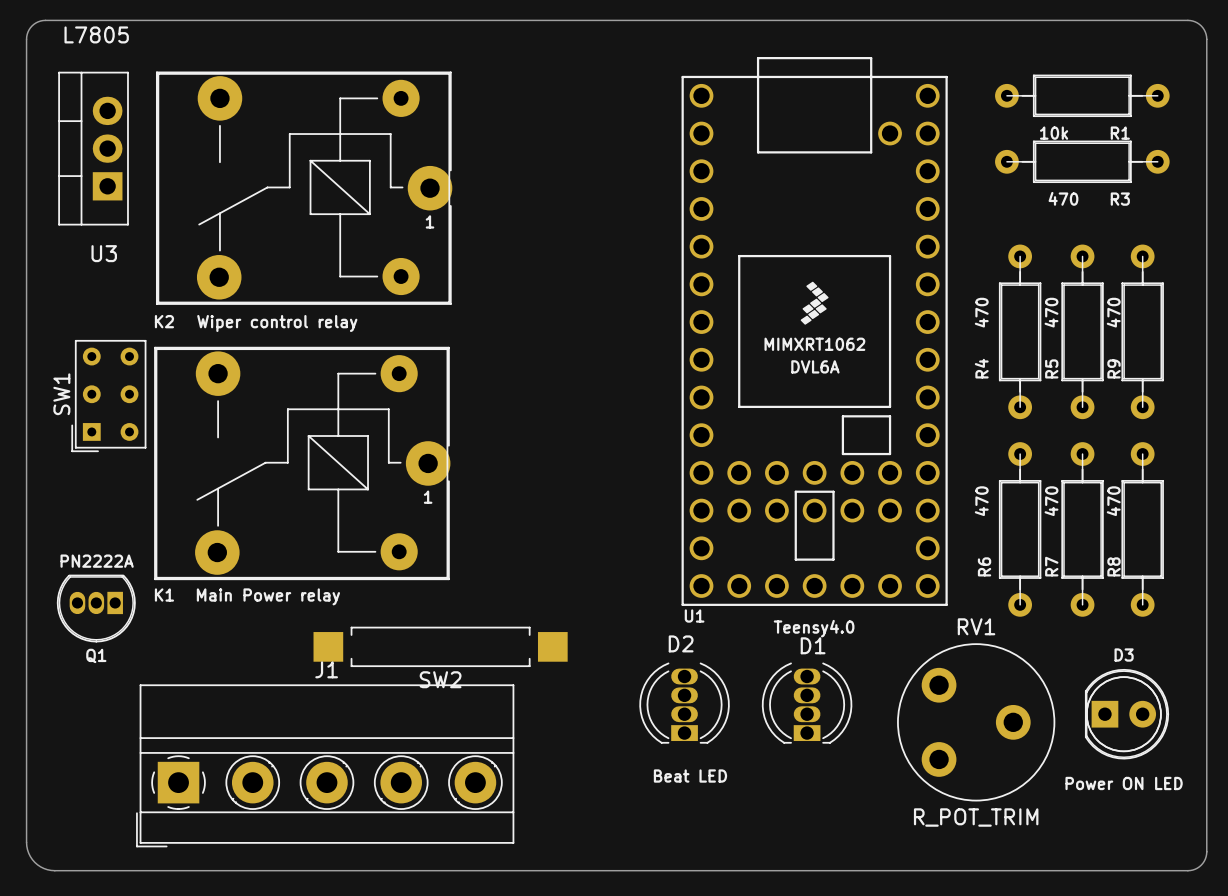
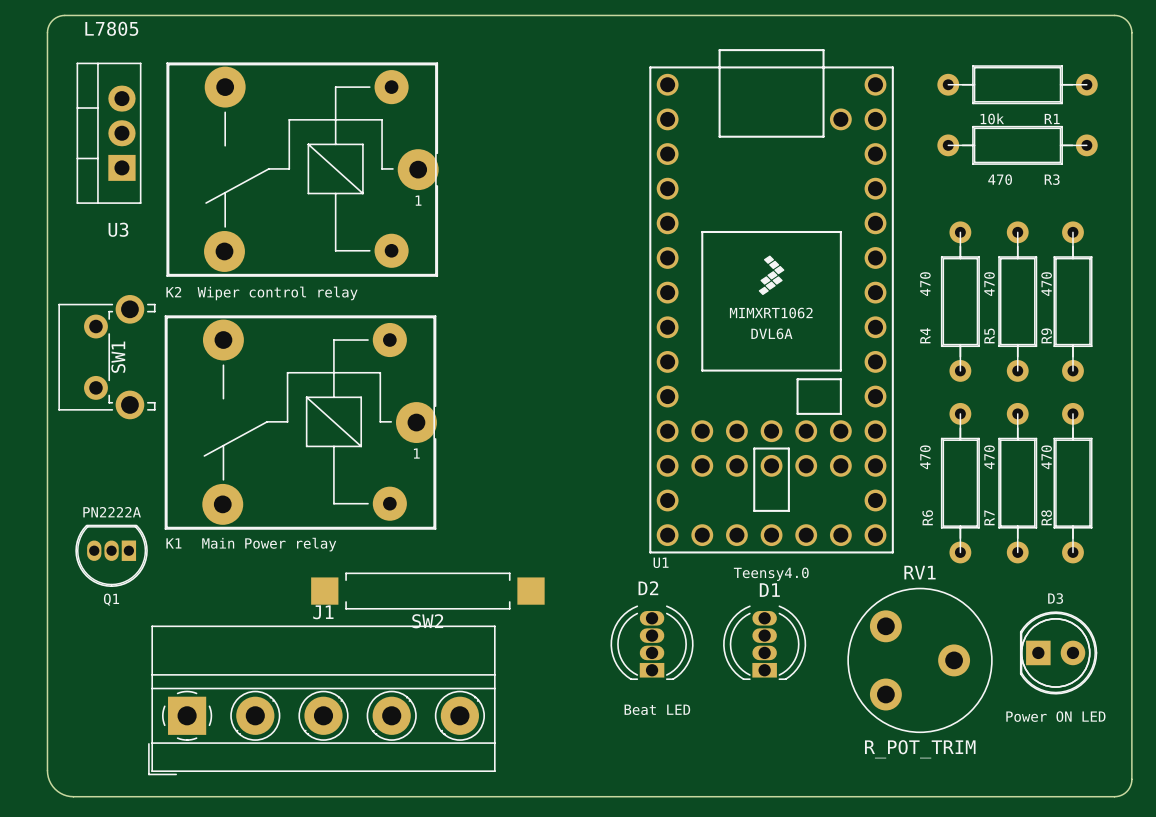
SW1 footprint: [71, 339, 147, 453] -> [58, 295, 156, 420]
SW1 name position: SW1 (61, 394) -> SW1 (118, 357)

